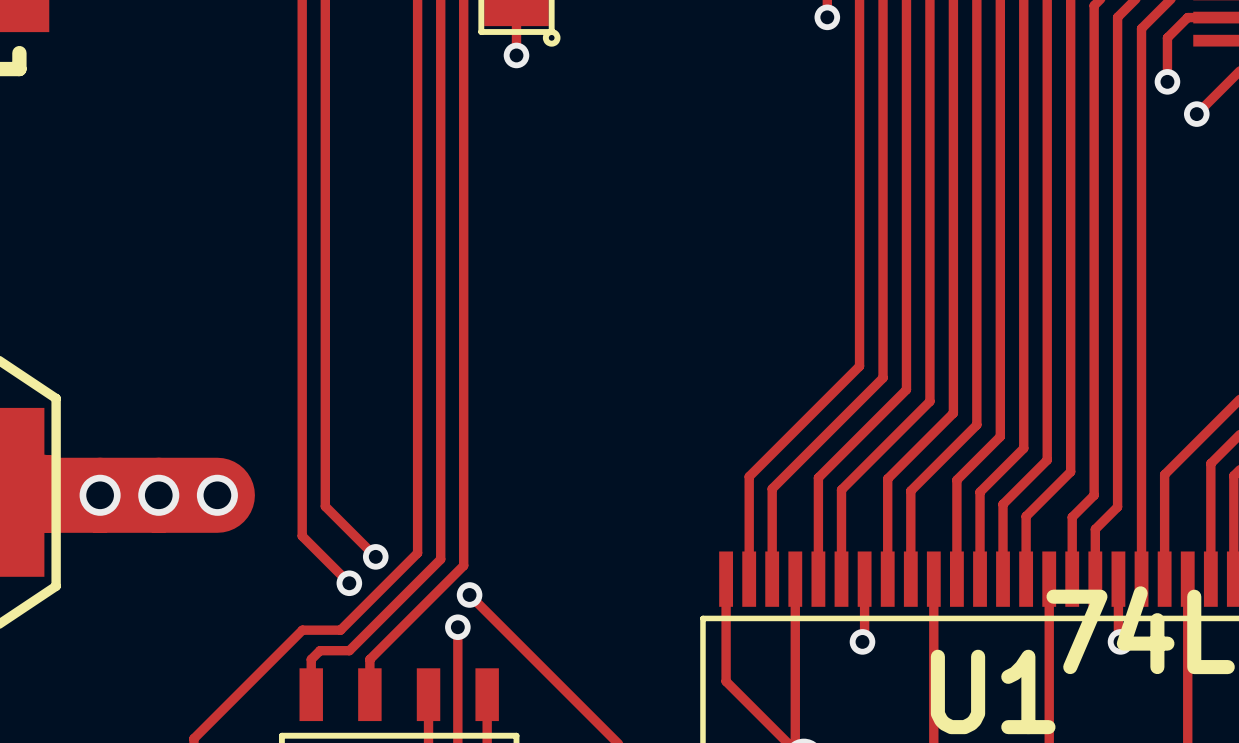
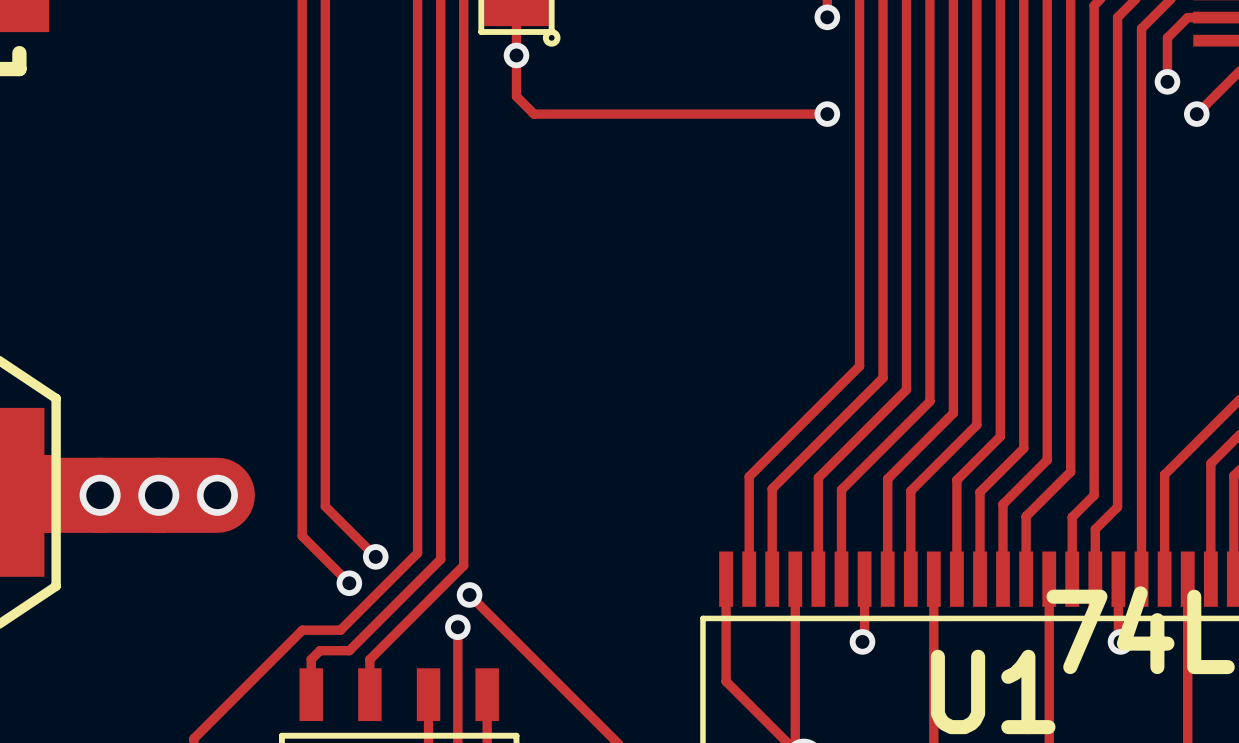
track: none -> (516, 55) (516, 96) (534, 114) (827, 114)
via: none -> (827, 114)

